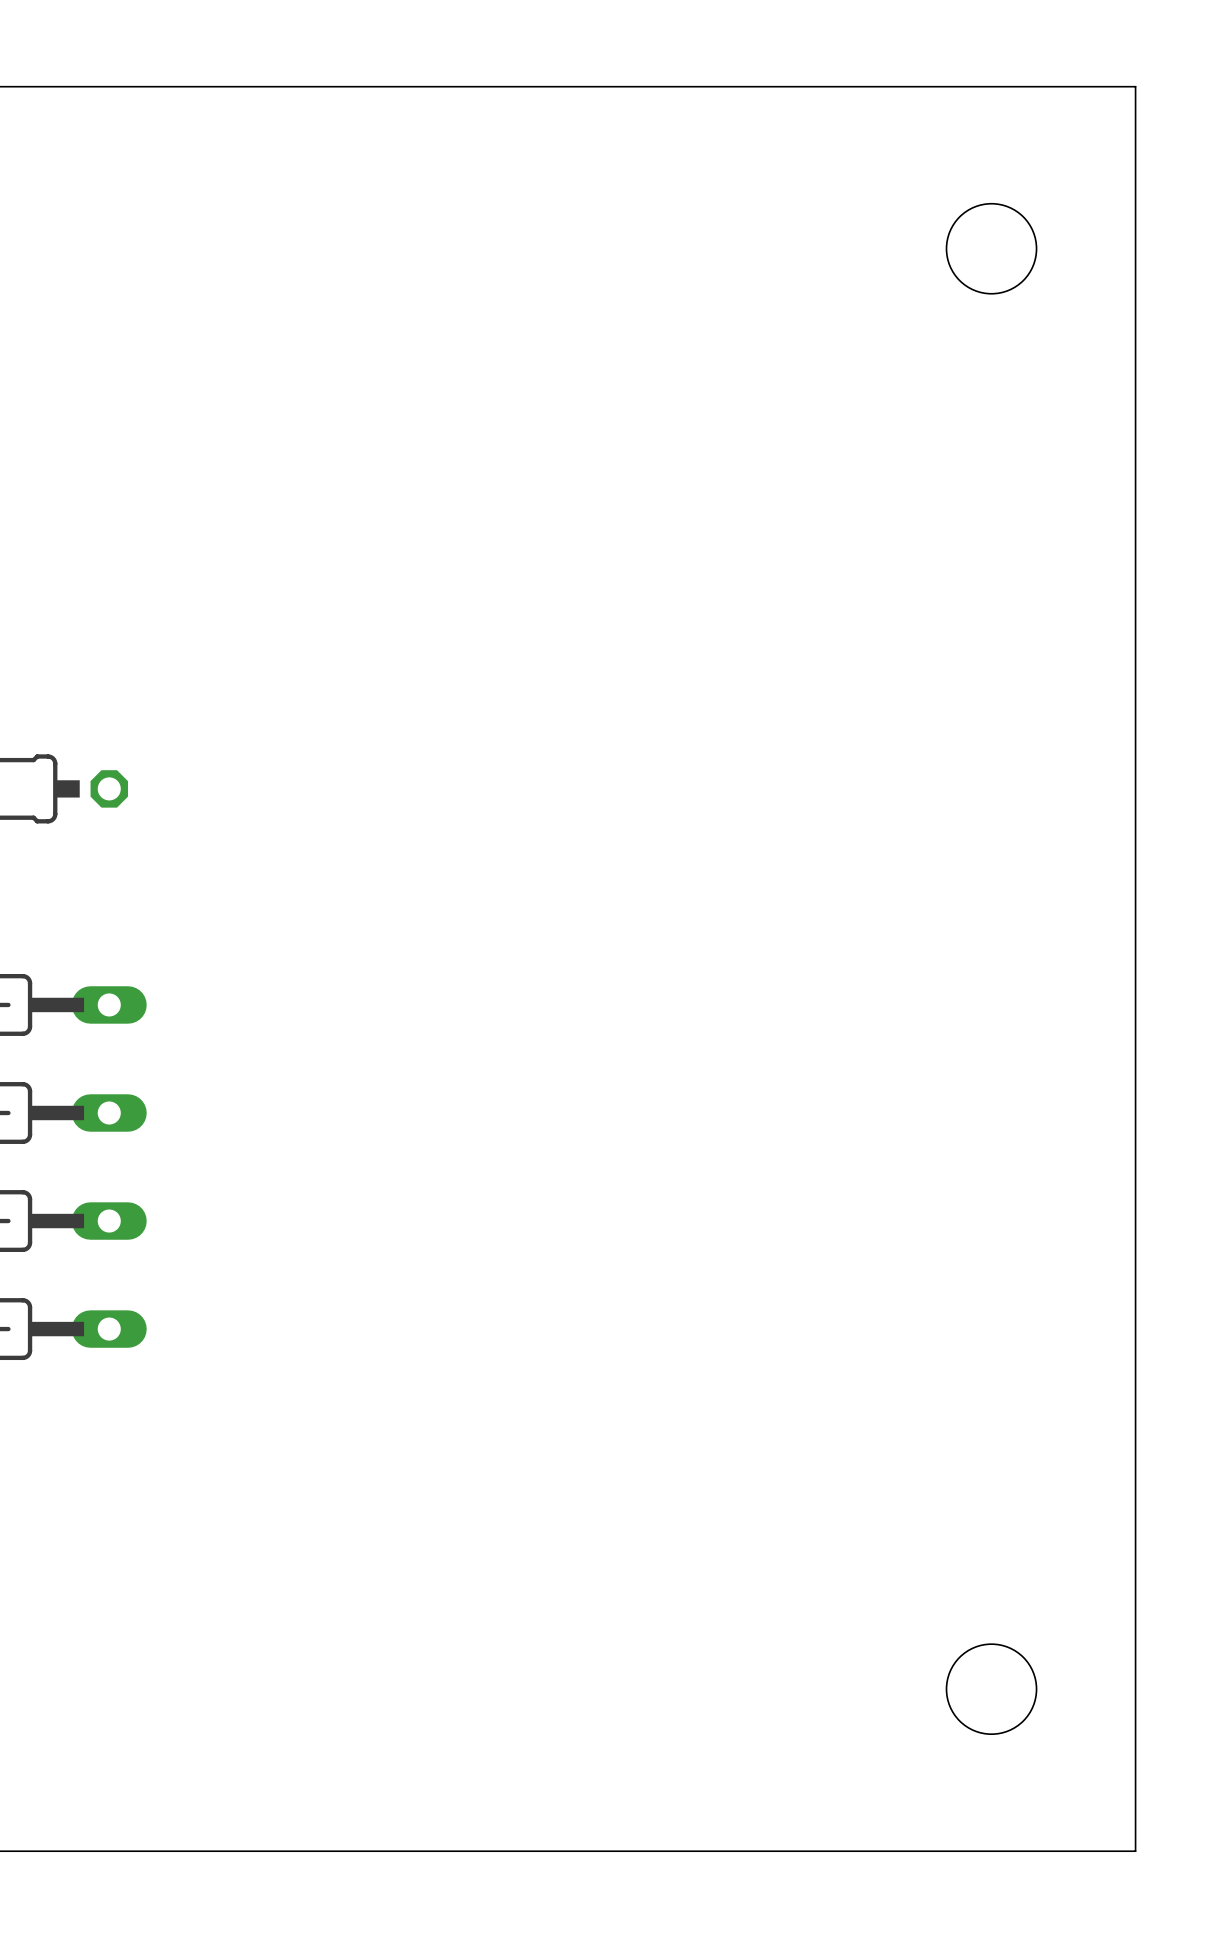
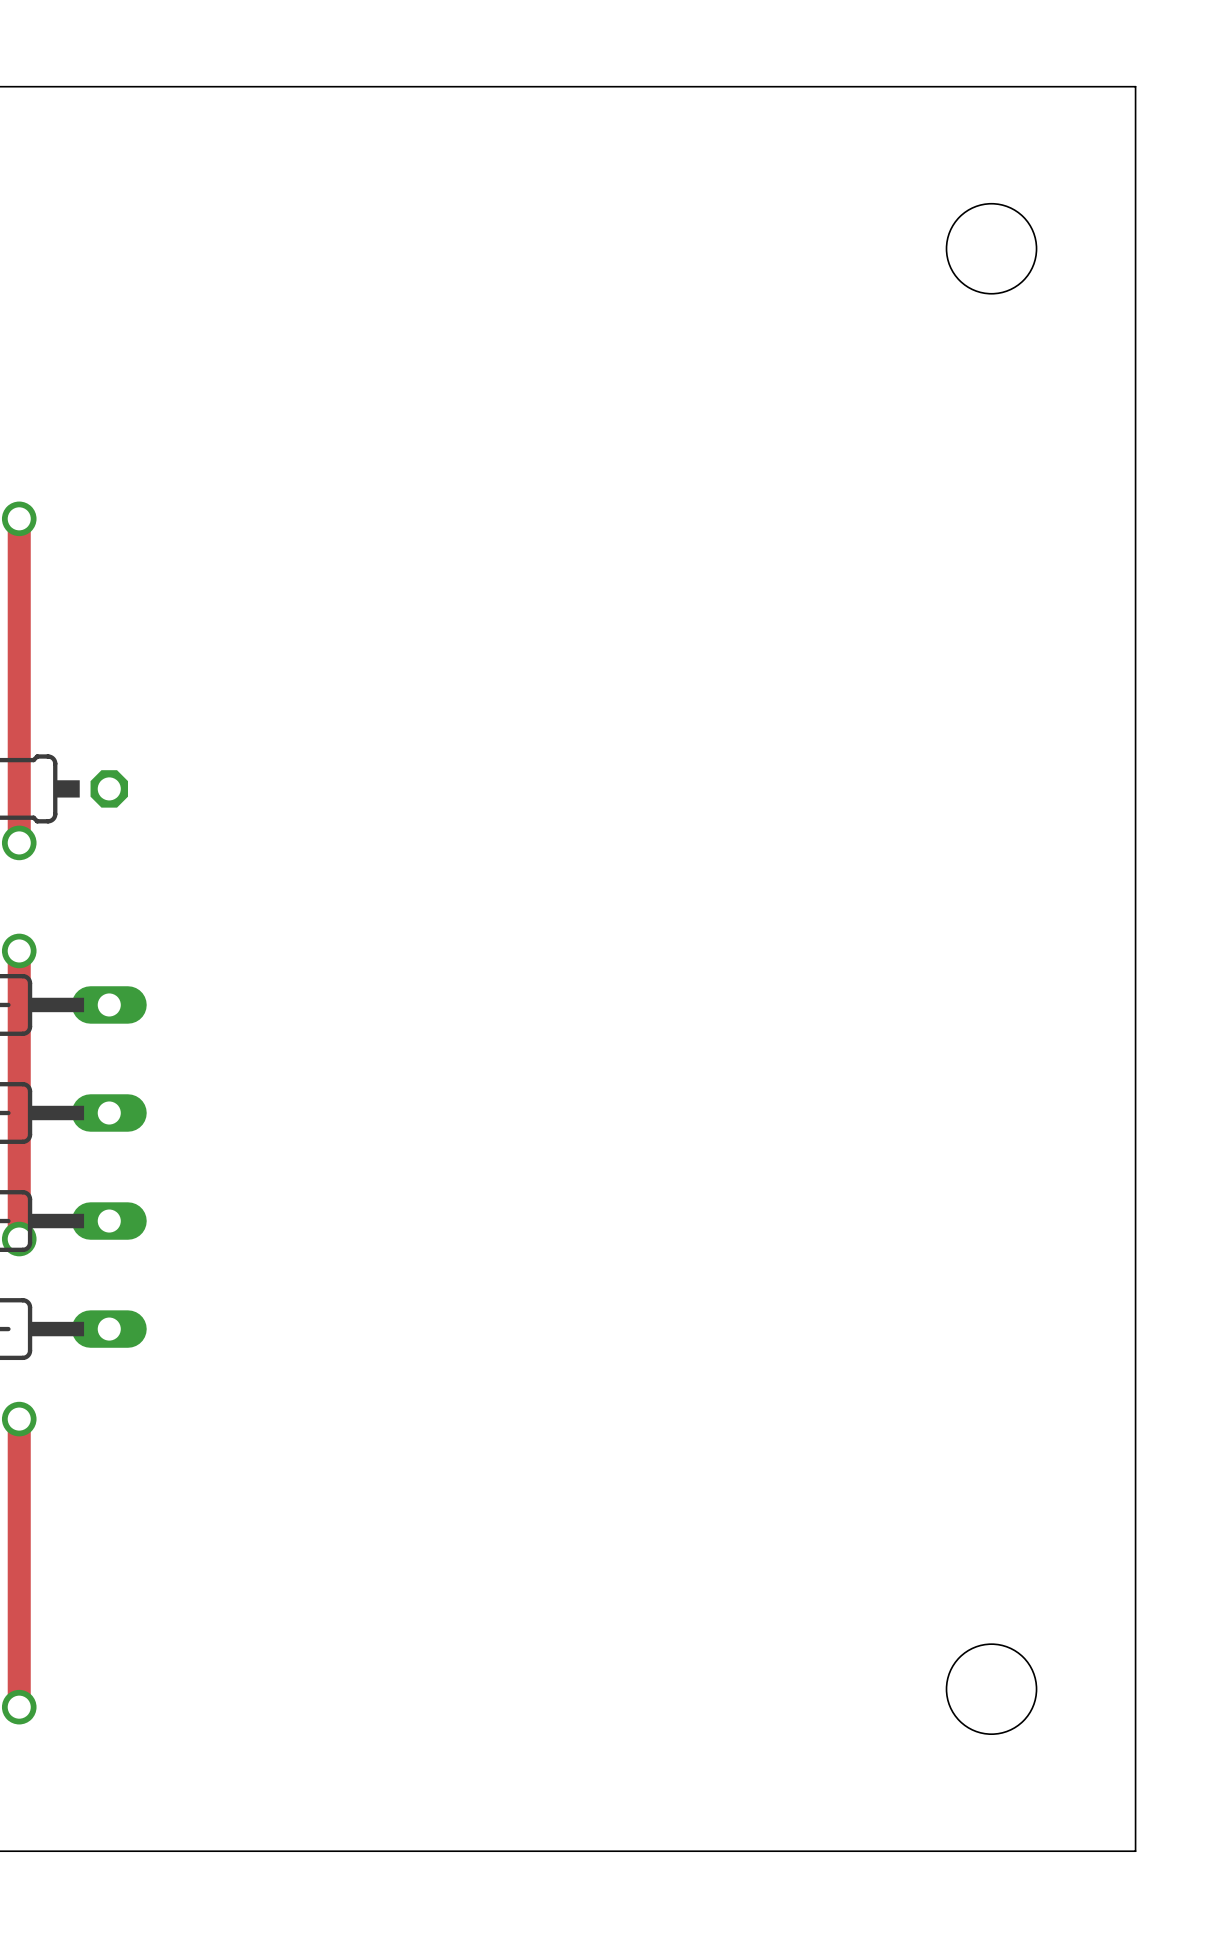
track: none -> (19, 518) (19, 842)
via: none -> (19, 518)
via: none -> (19, 842)
track: none -> (19, 950) (19, 1239)
via: none -> (19, 950)
via: none -> (19, 1239)
track: none -> (19, 1419) (19, 1707)
via: none -> (19, 1419)
via: none -> (19, 1707)

